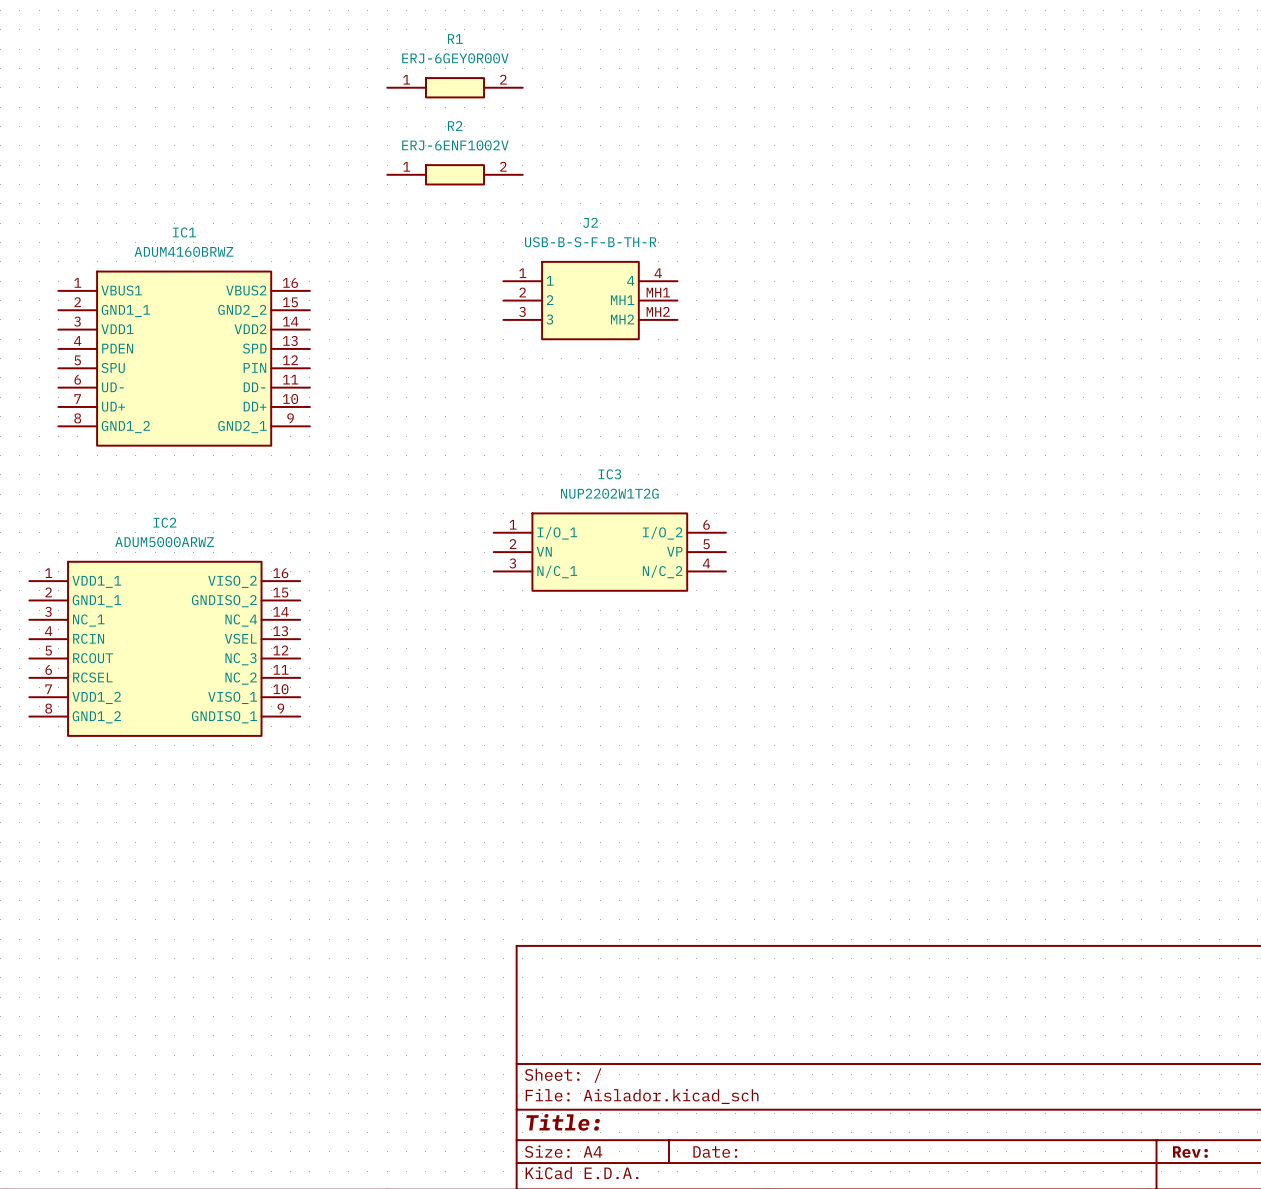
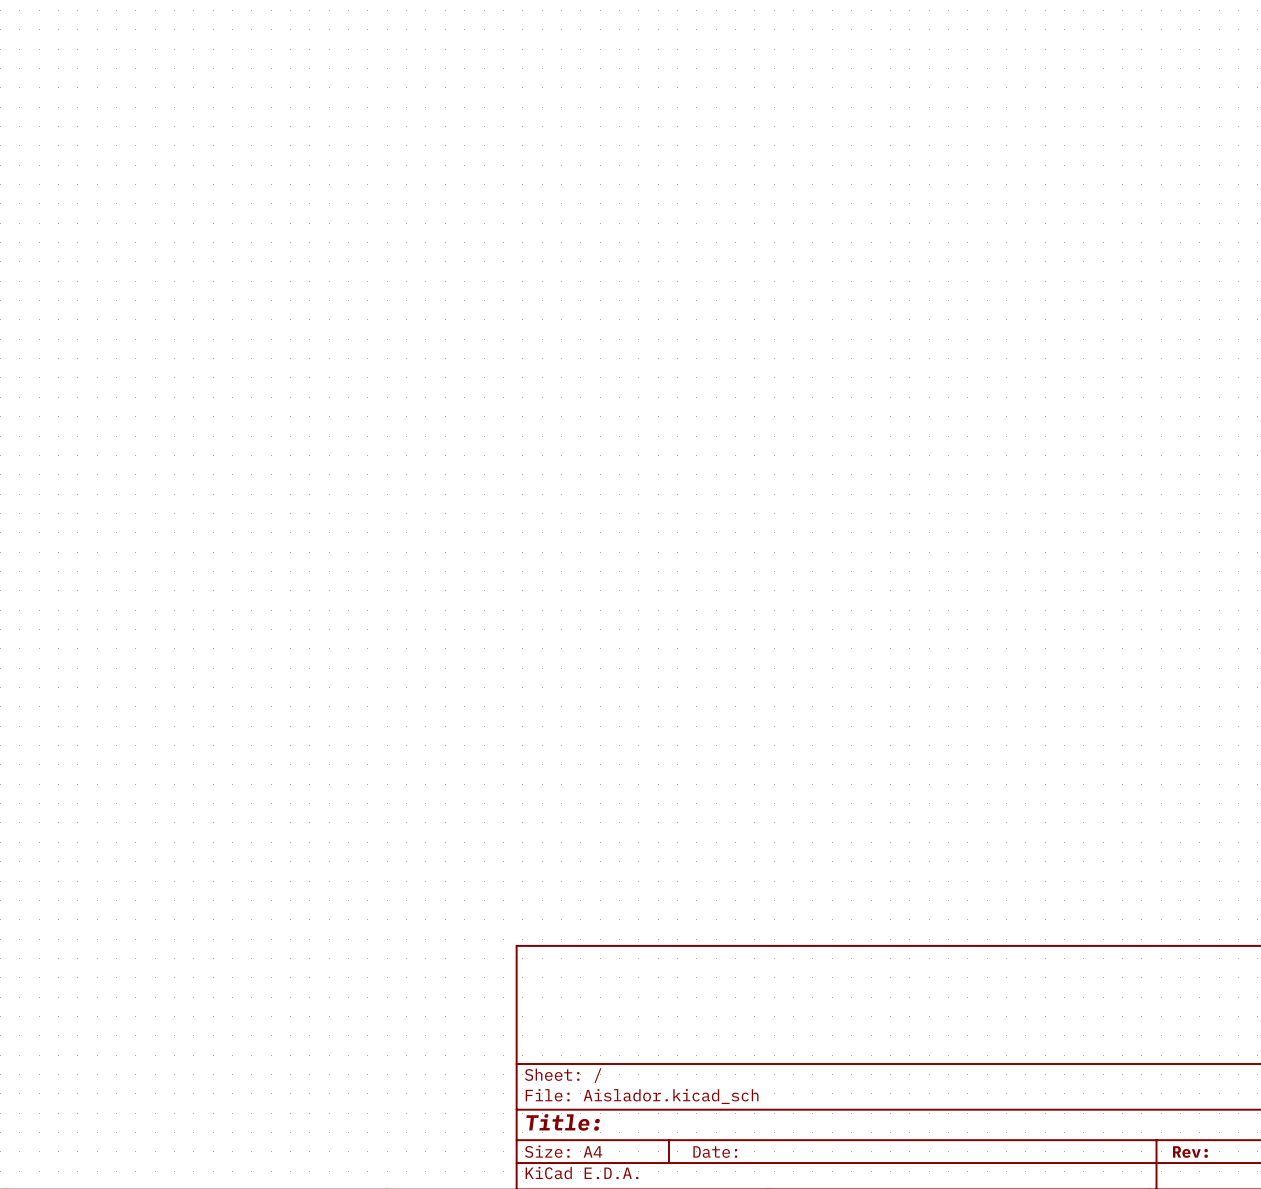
R1: ERJ-6GEY0R00V (455, 87) -> none
R2: ERJ-6ENF1002V (455, 174) -> none
J2: USB-B-S-F-B-TH-R (590, 300) -> none
IC1: ADUM4160BRWZ (184, 358) -> none
IC3: NUP2202W1T2G (609, 552) -> none
IC2: ADUM5000ARWZ (164, 648) -> none

